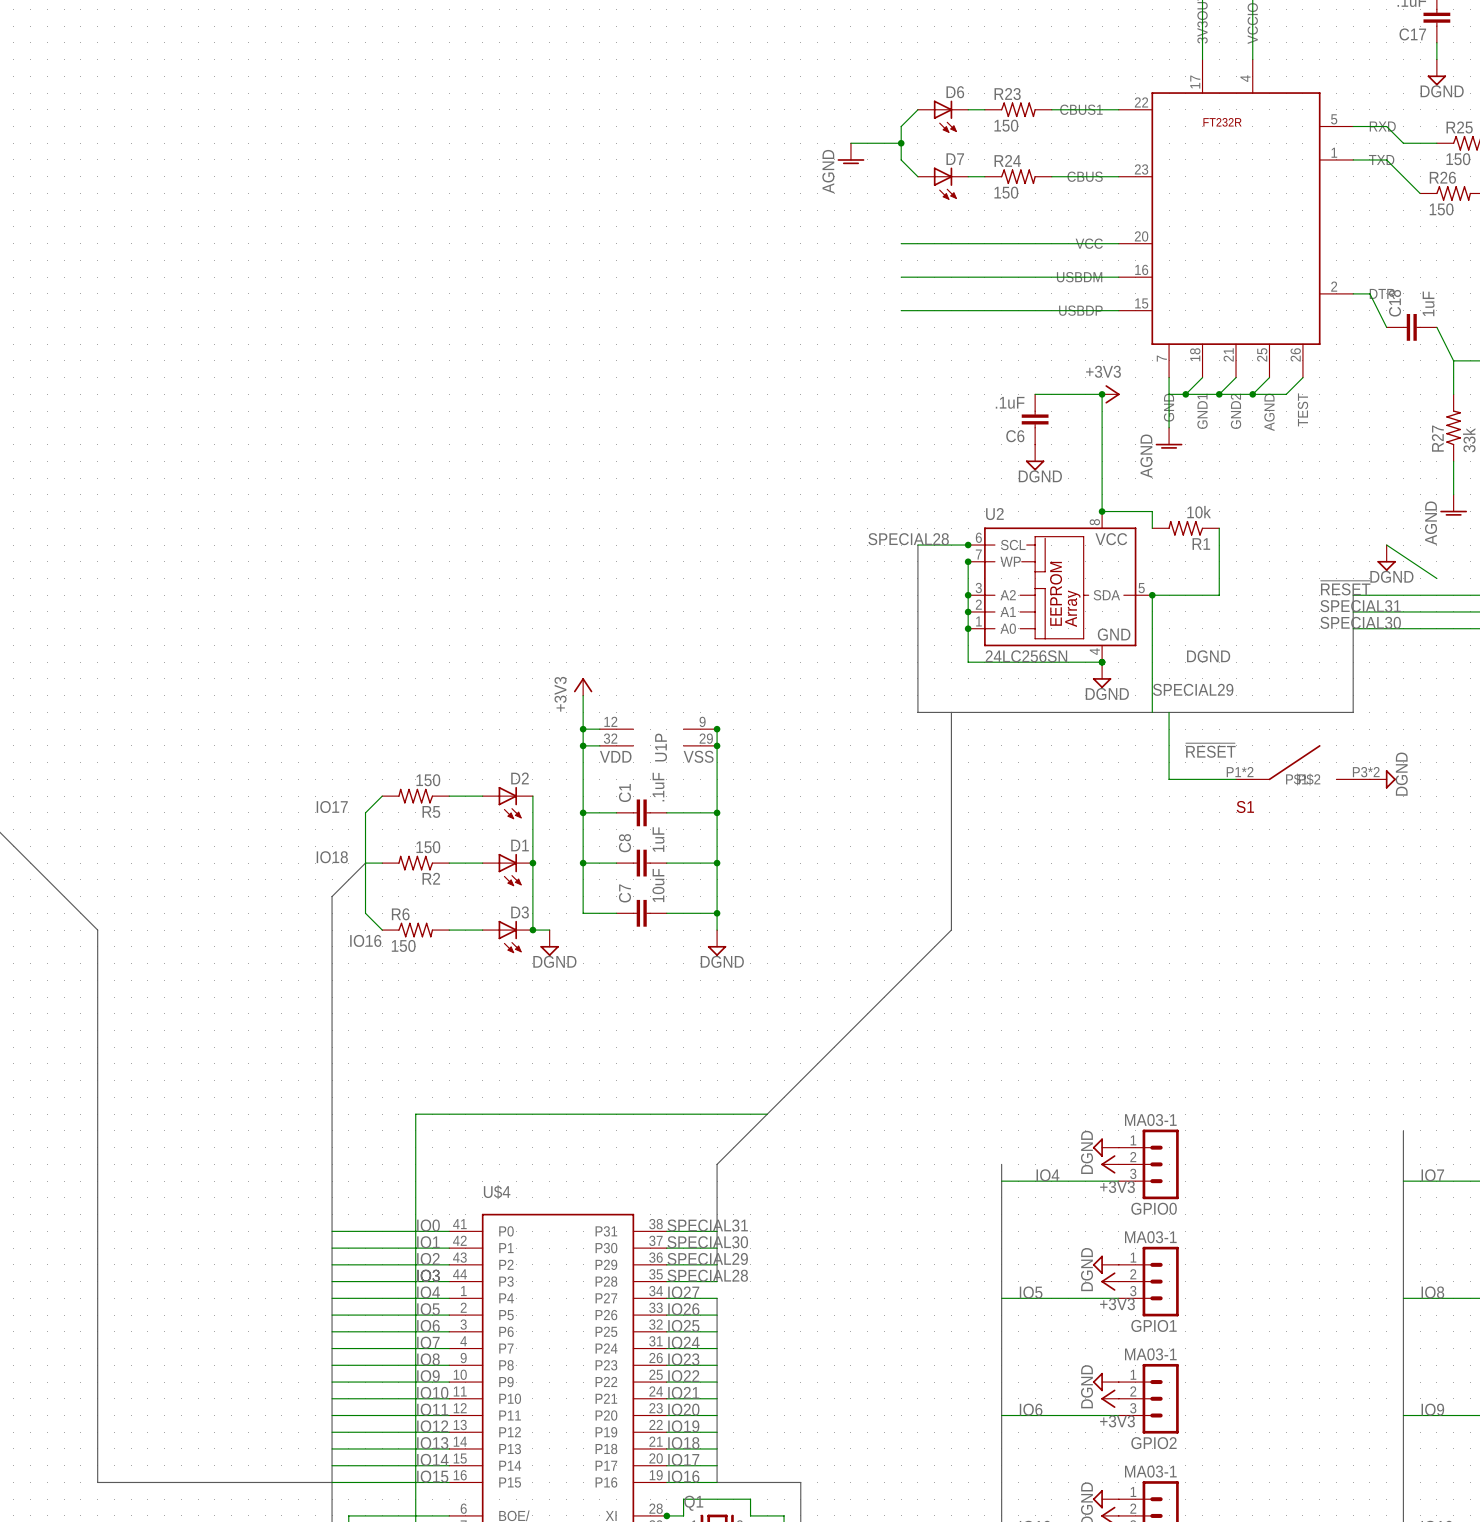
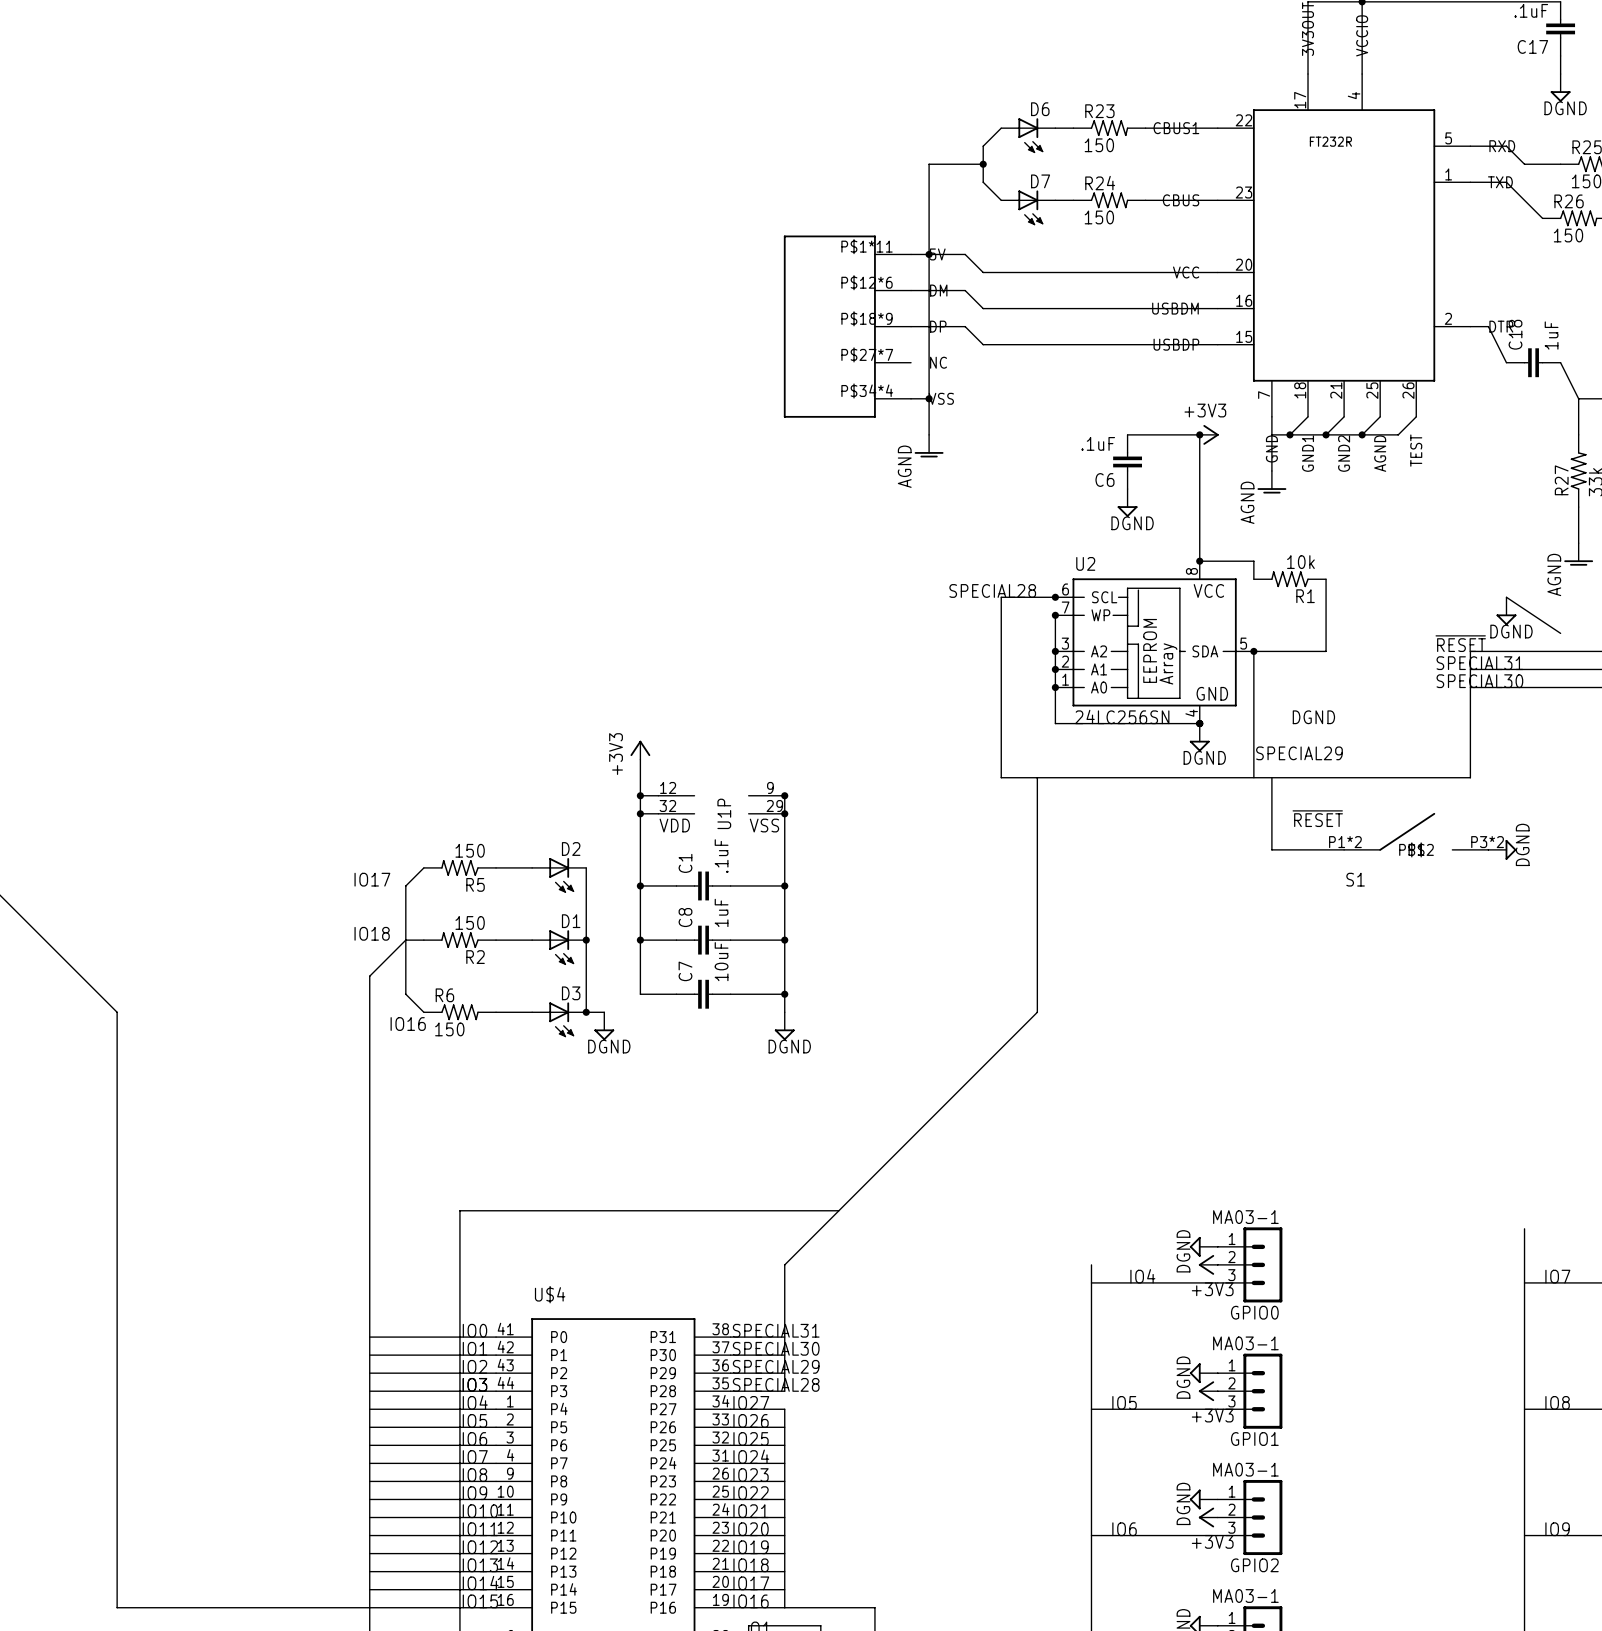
wire: none -> (929, 164) (929, 434)
power symbol: AGND (850, 153) -> none
wire: none -> (911, 254) (965, 254) (983, 272)
junction: none -> (929, 254)
wire: none -> (911, 290) (965, 290) (983, 308)
part: none -> (847, 326)
wire: none -> (911, 326) (965, 326) (983, 344)
wire: none -> (911, 398) (929, 398)
junction: none -> (929, 398)
power symbol: none -> AGND (929, 446)

